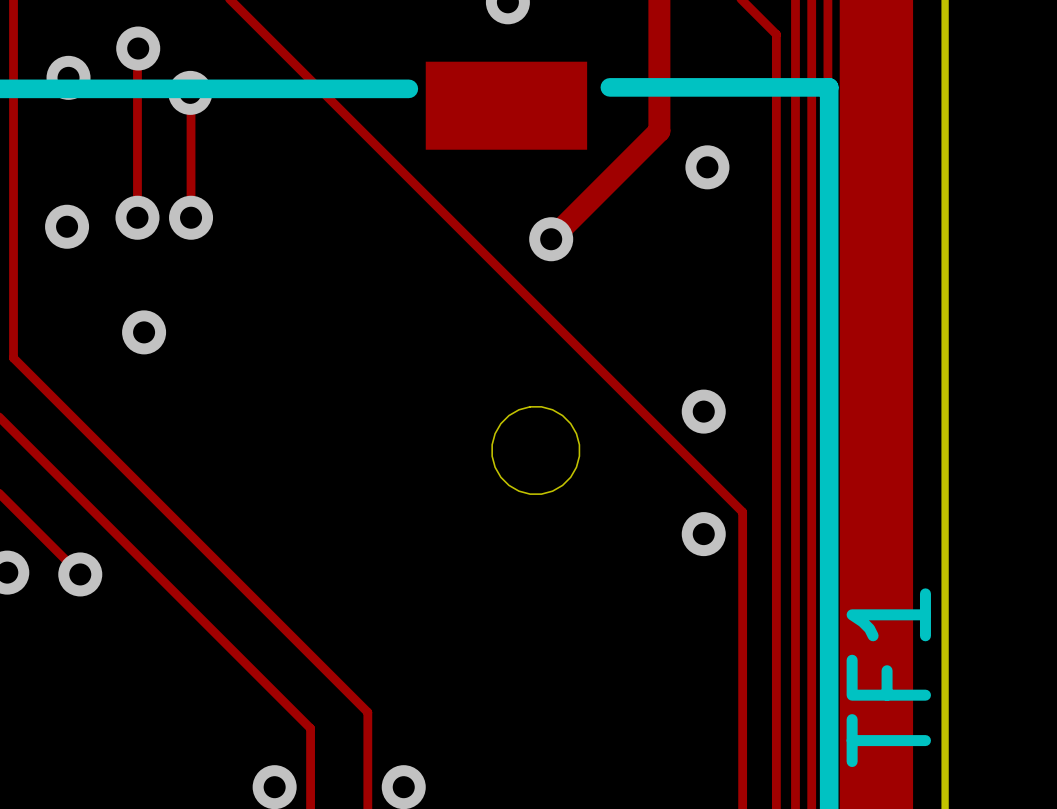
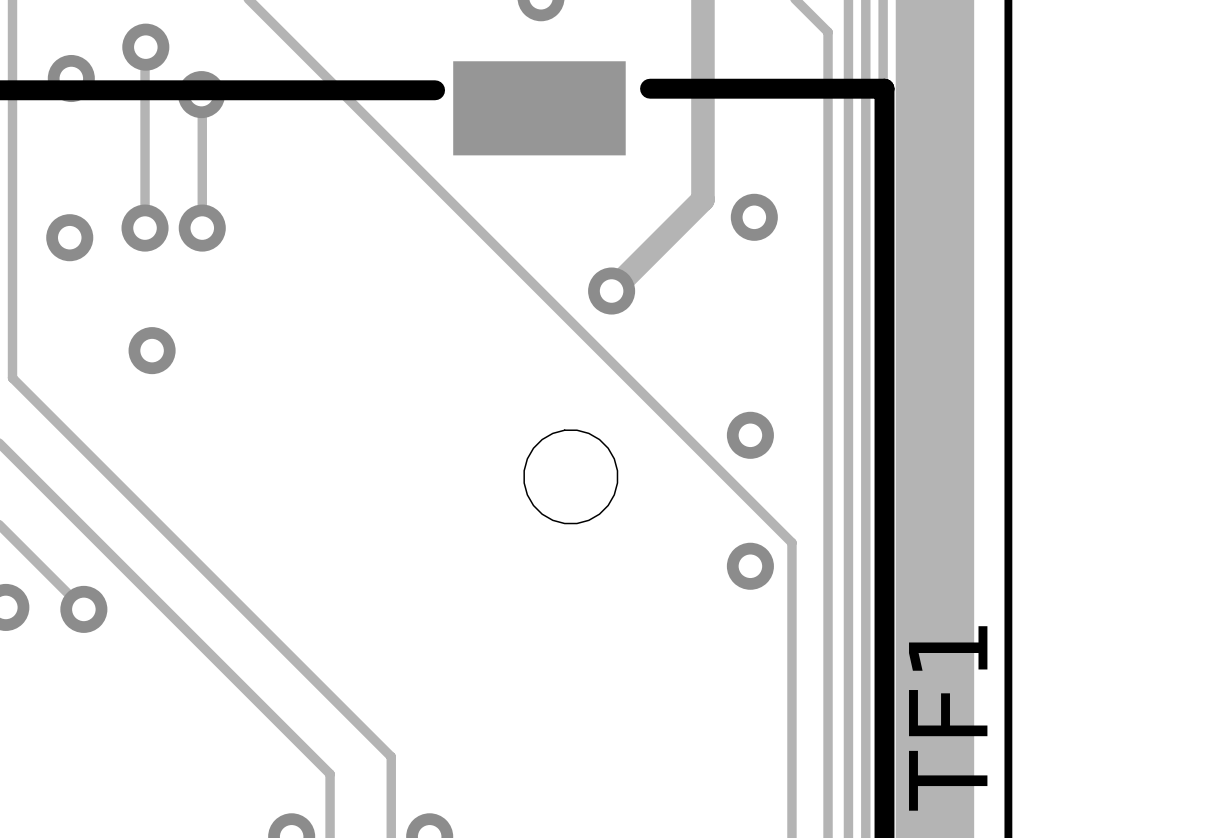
track: (659, 131) (551, 239) -> (702, 135) (702, 199) (611, 291)
via position: (707, 167) -> (754, 217)
via position: (551, 239) -> (611, 291)

